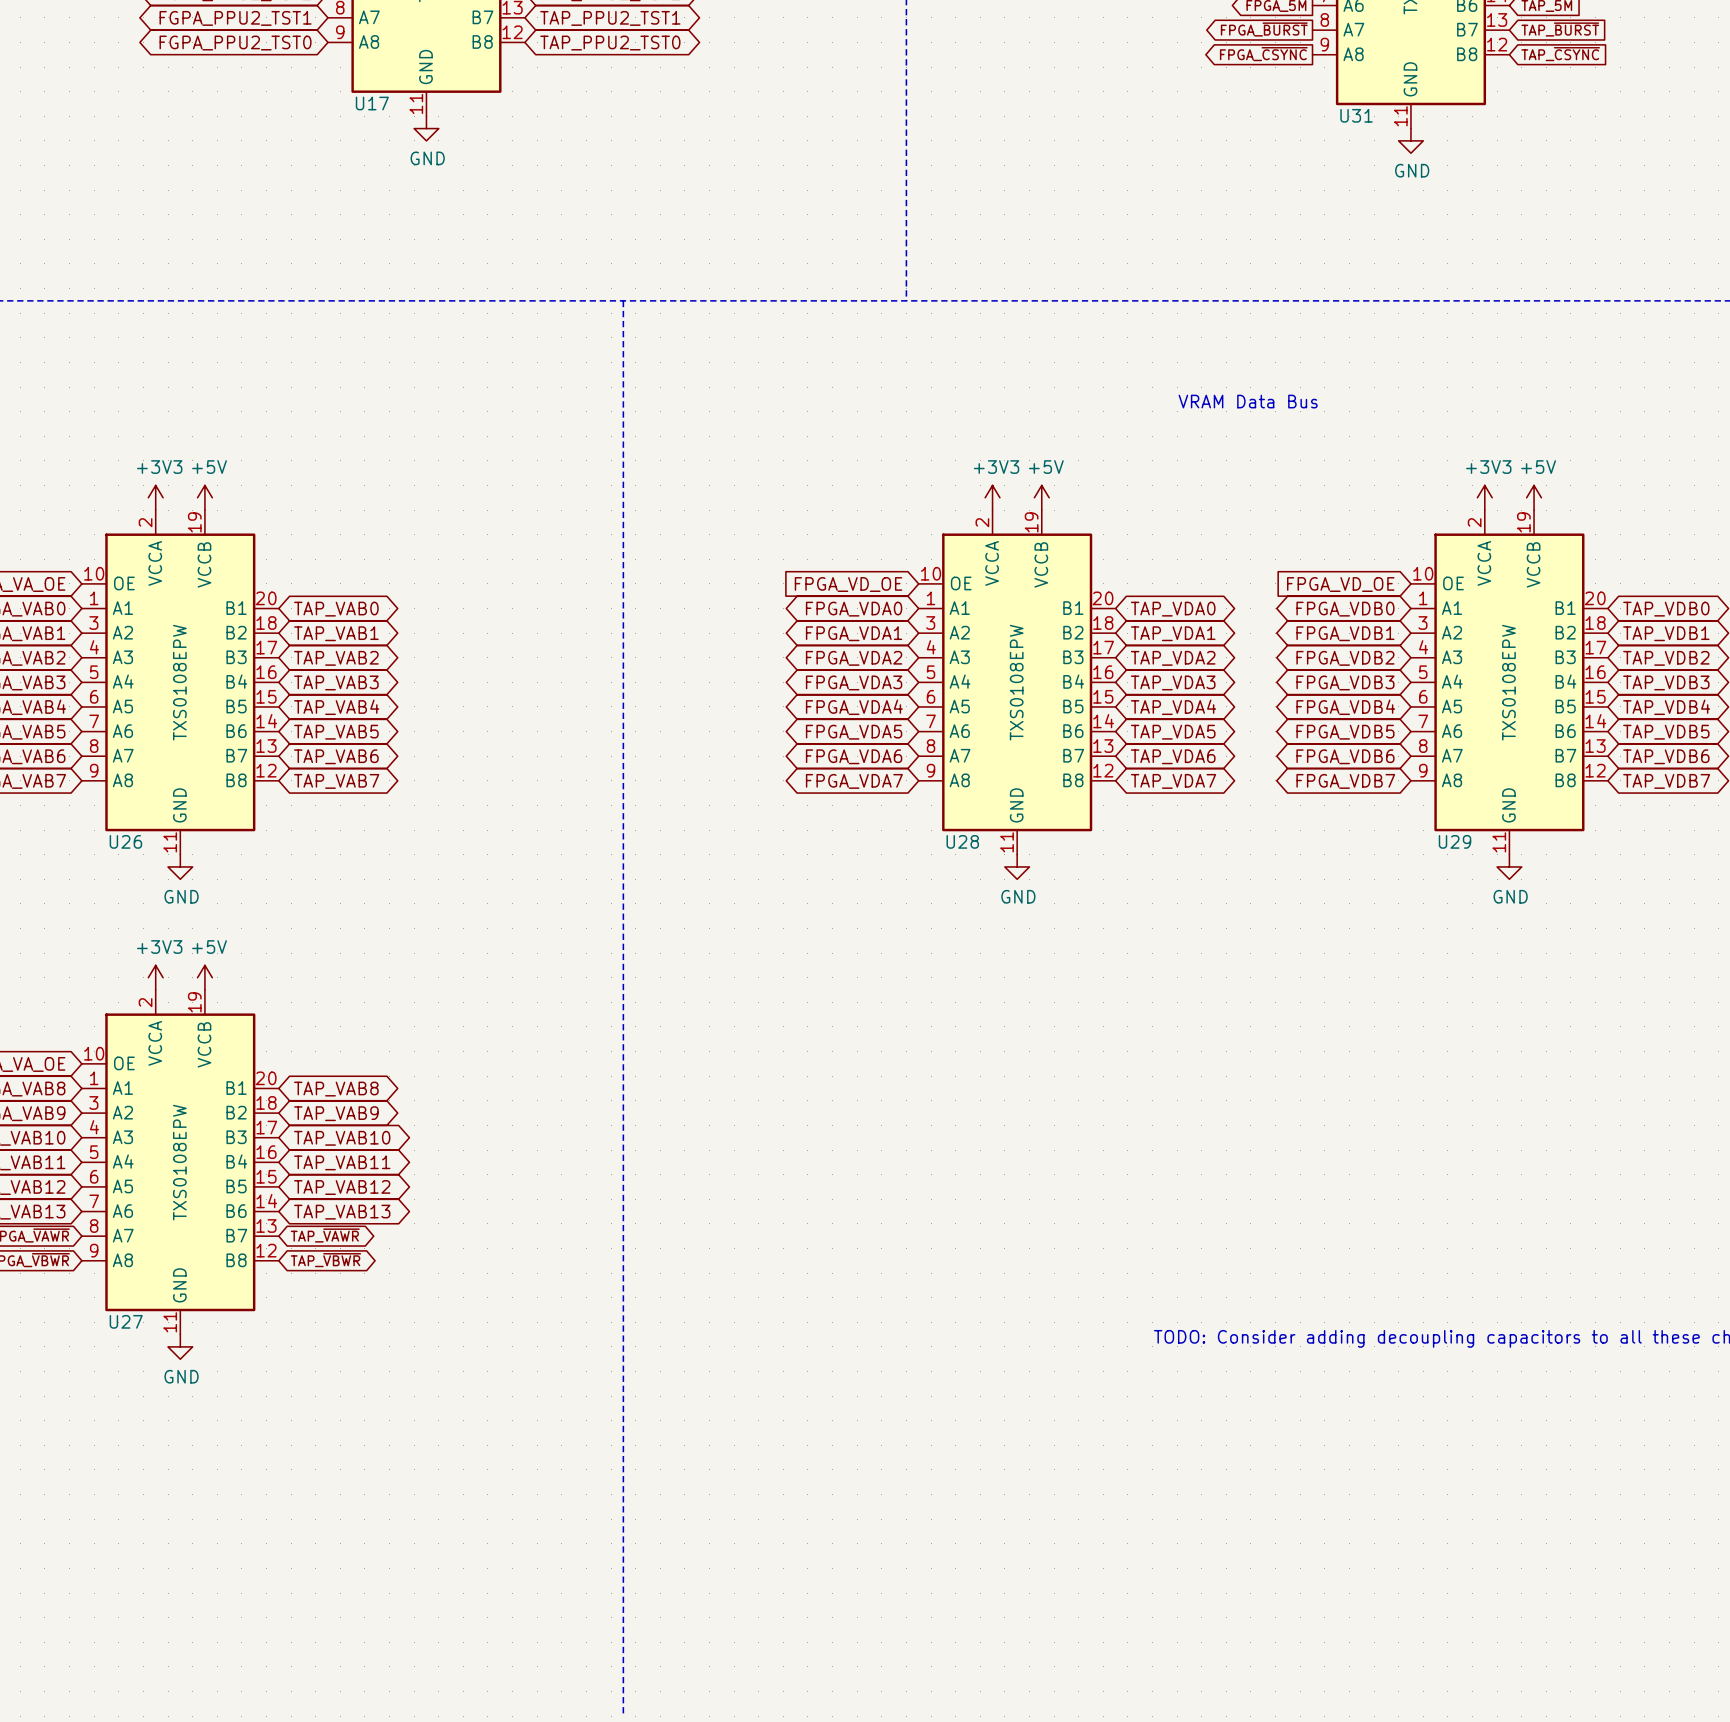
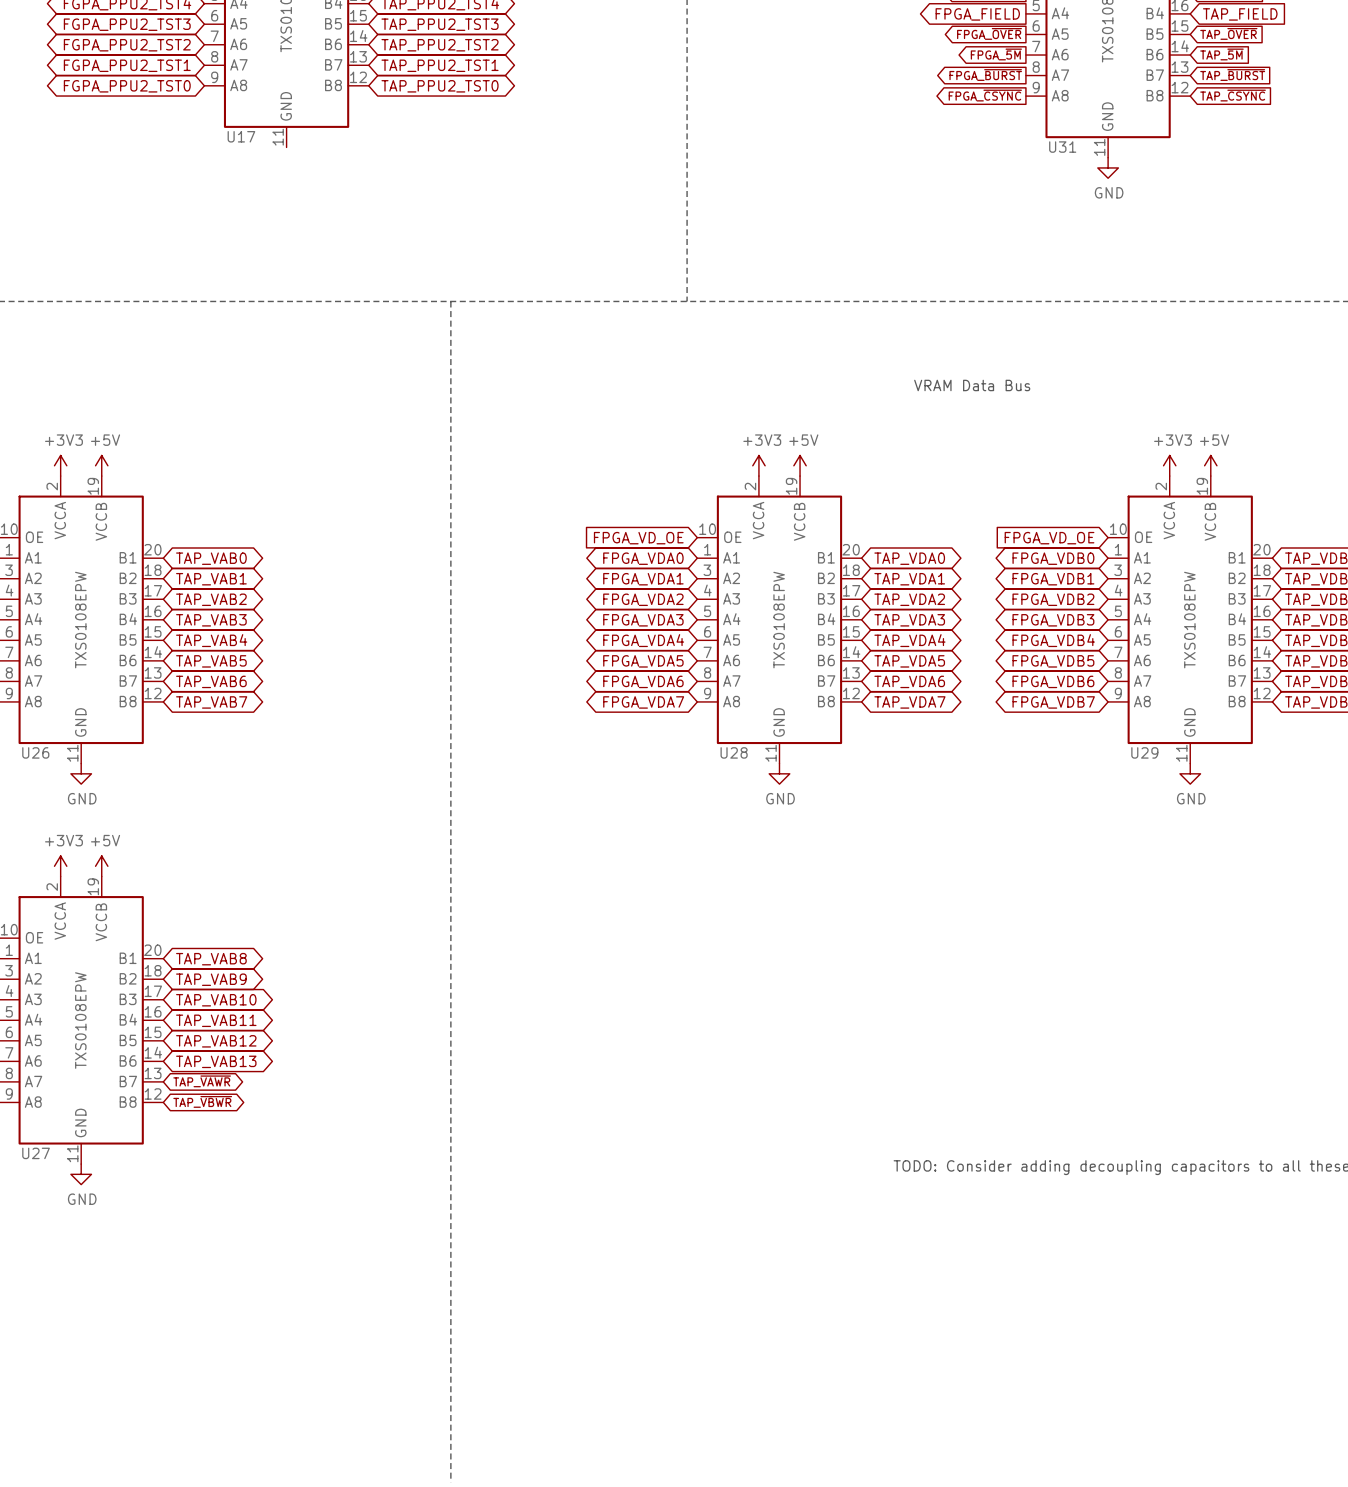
power symbol: GND (426, 128) -> none

